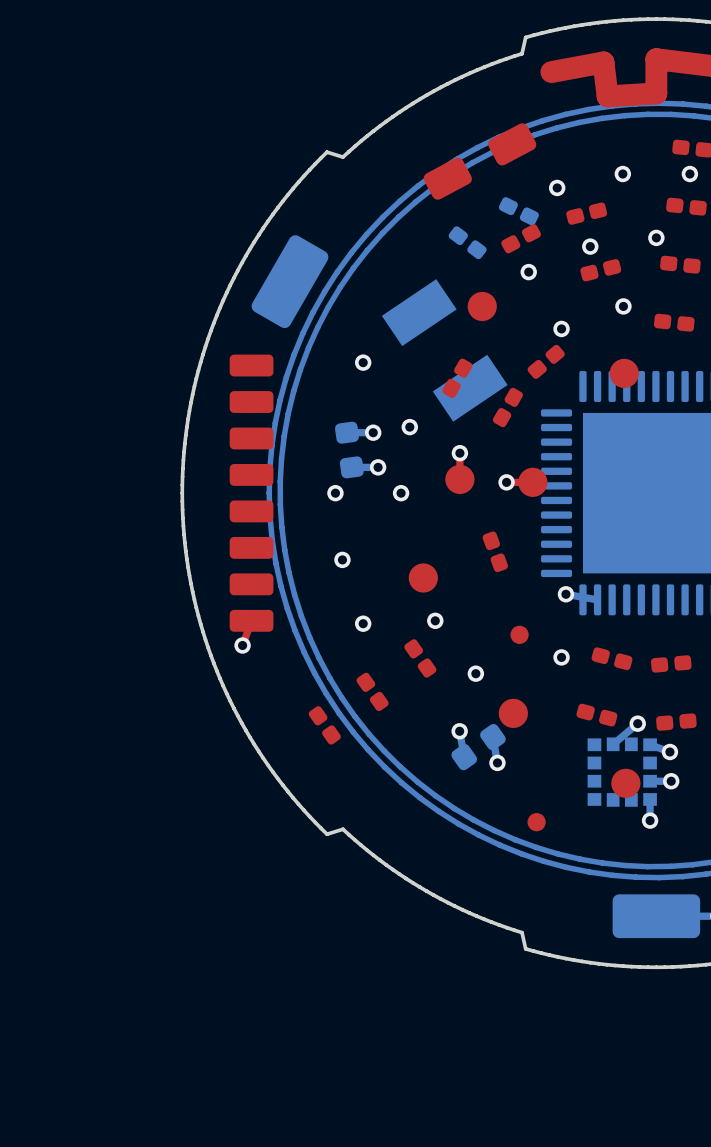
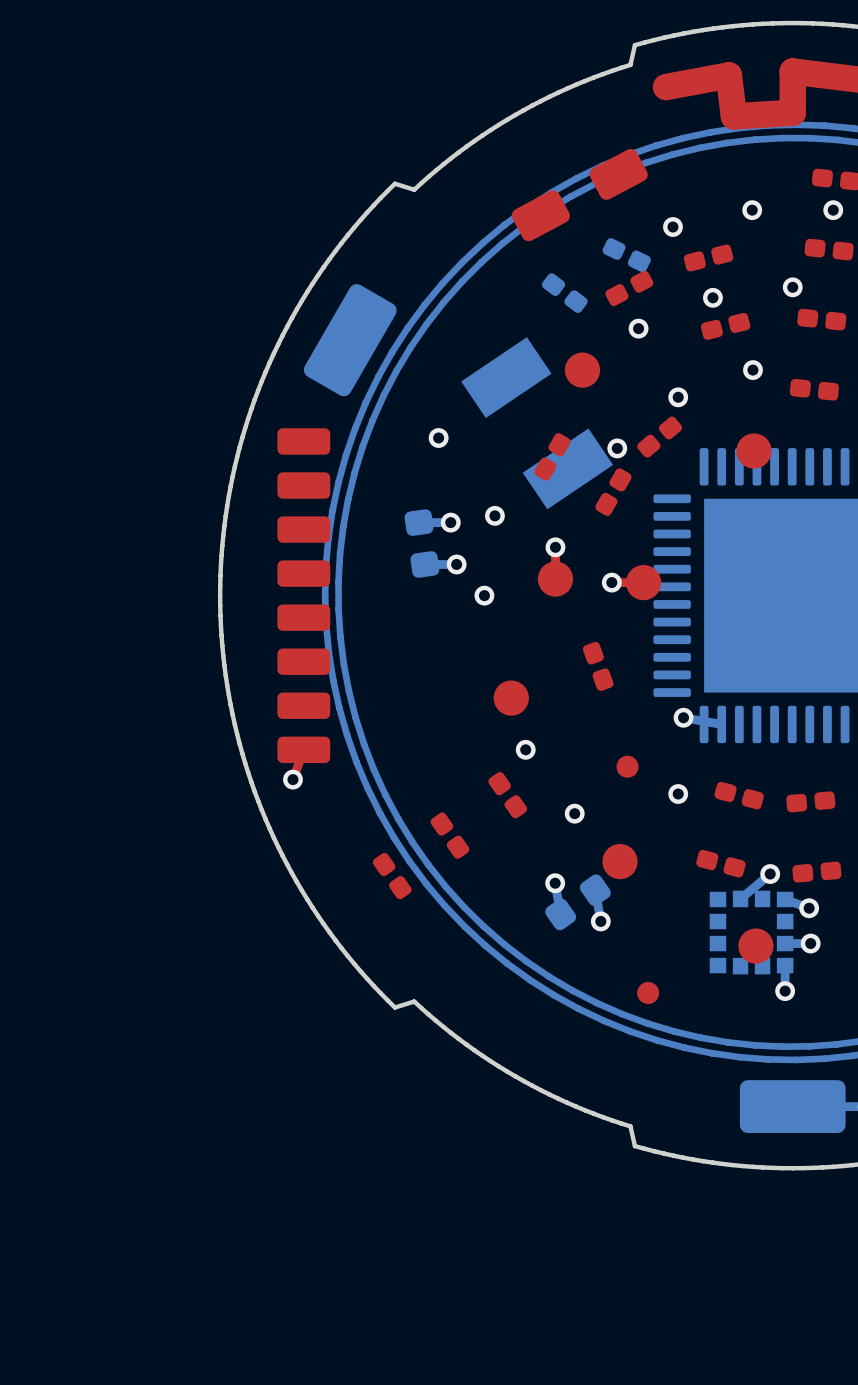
via: none -> (617, 448)
via: (335, 493) -> none
via: (342, 559) -> none
via: (363, 623) -> none

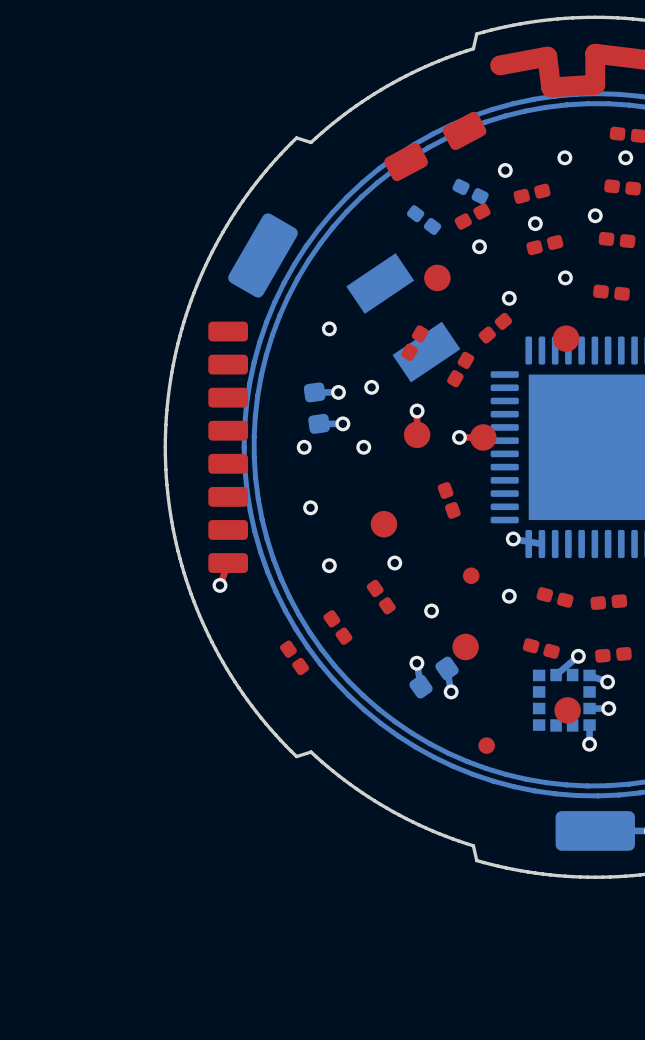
via: (617, 448) -> none
via: none -> (304, 447)
via: none -> (310, 507)
via: none -> (329, 565)

